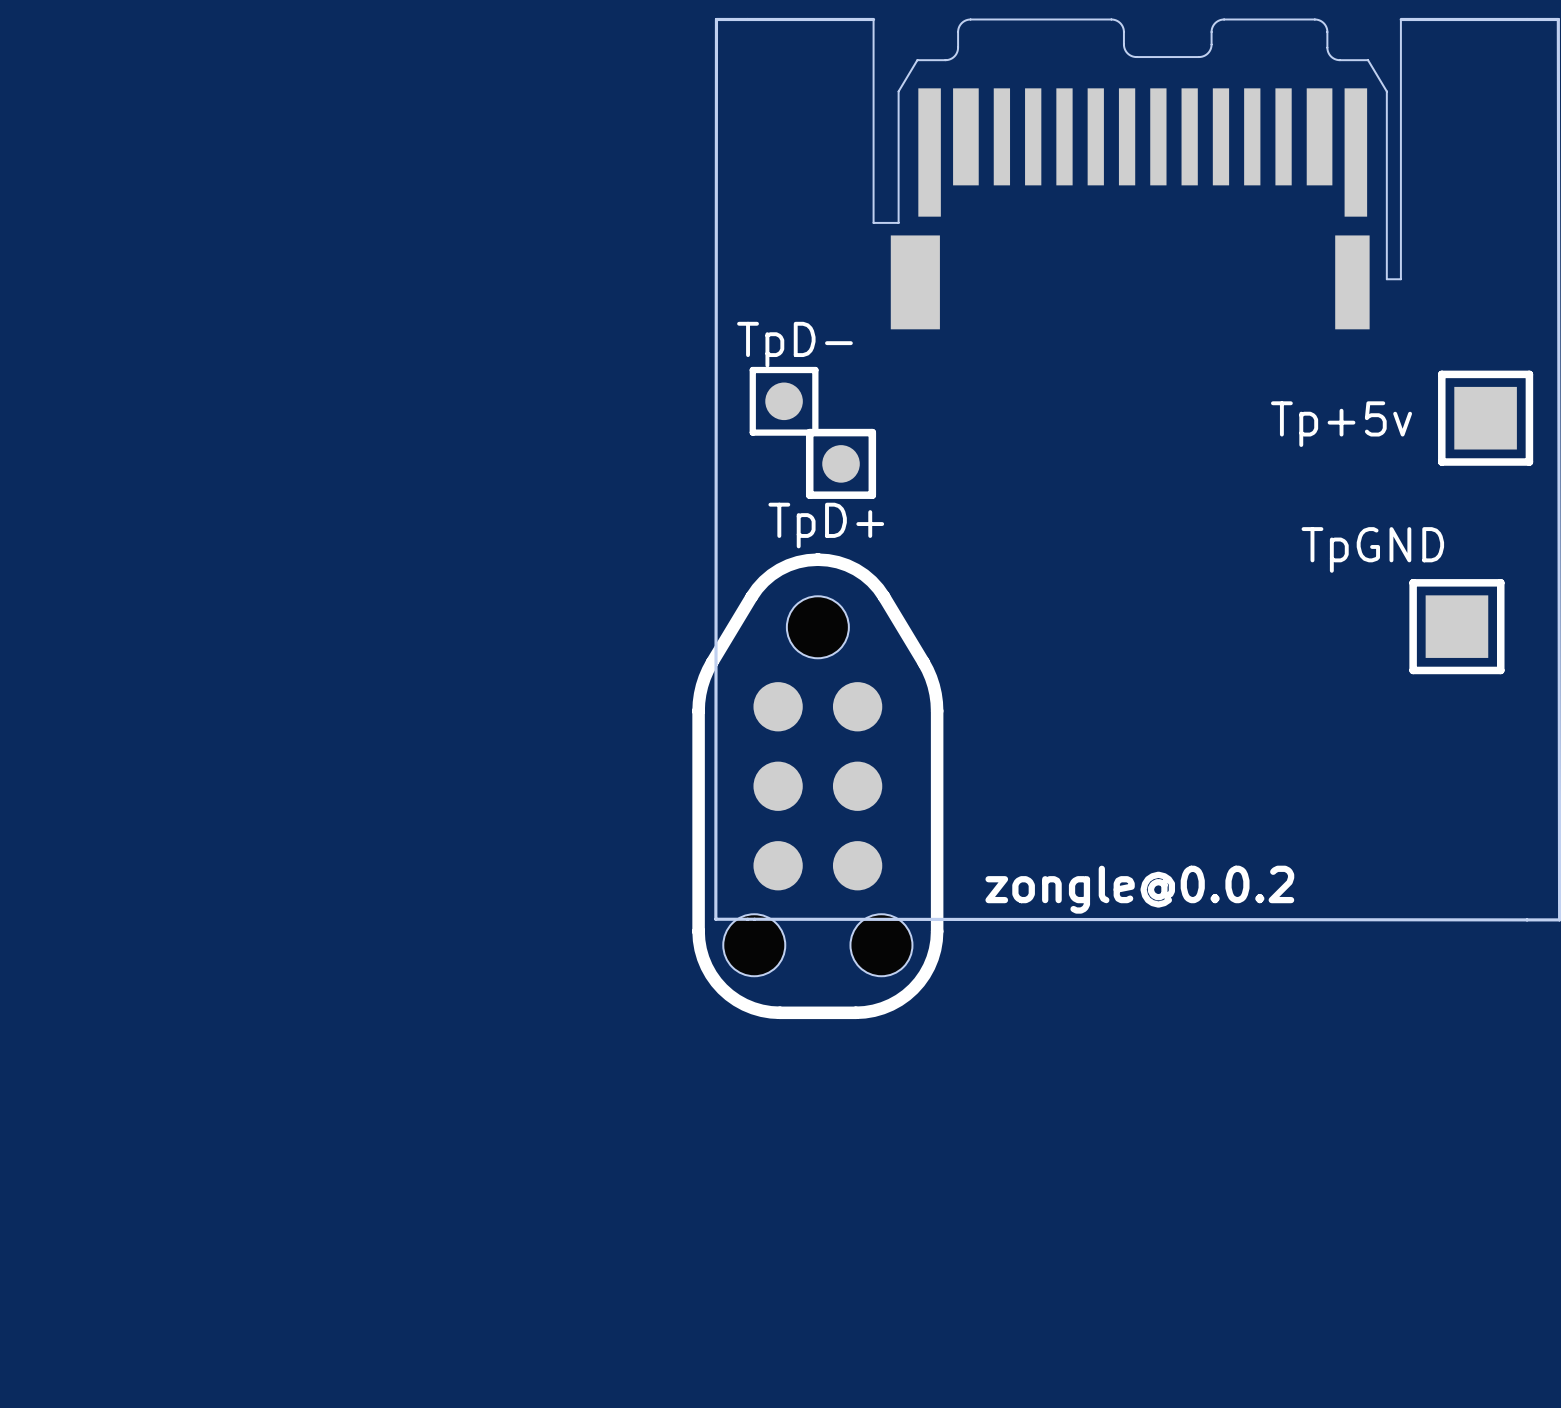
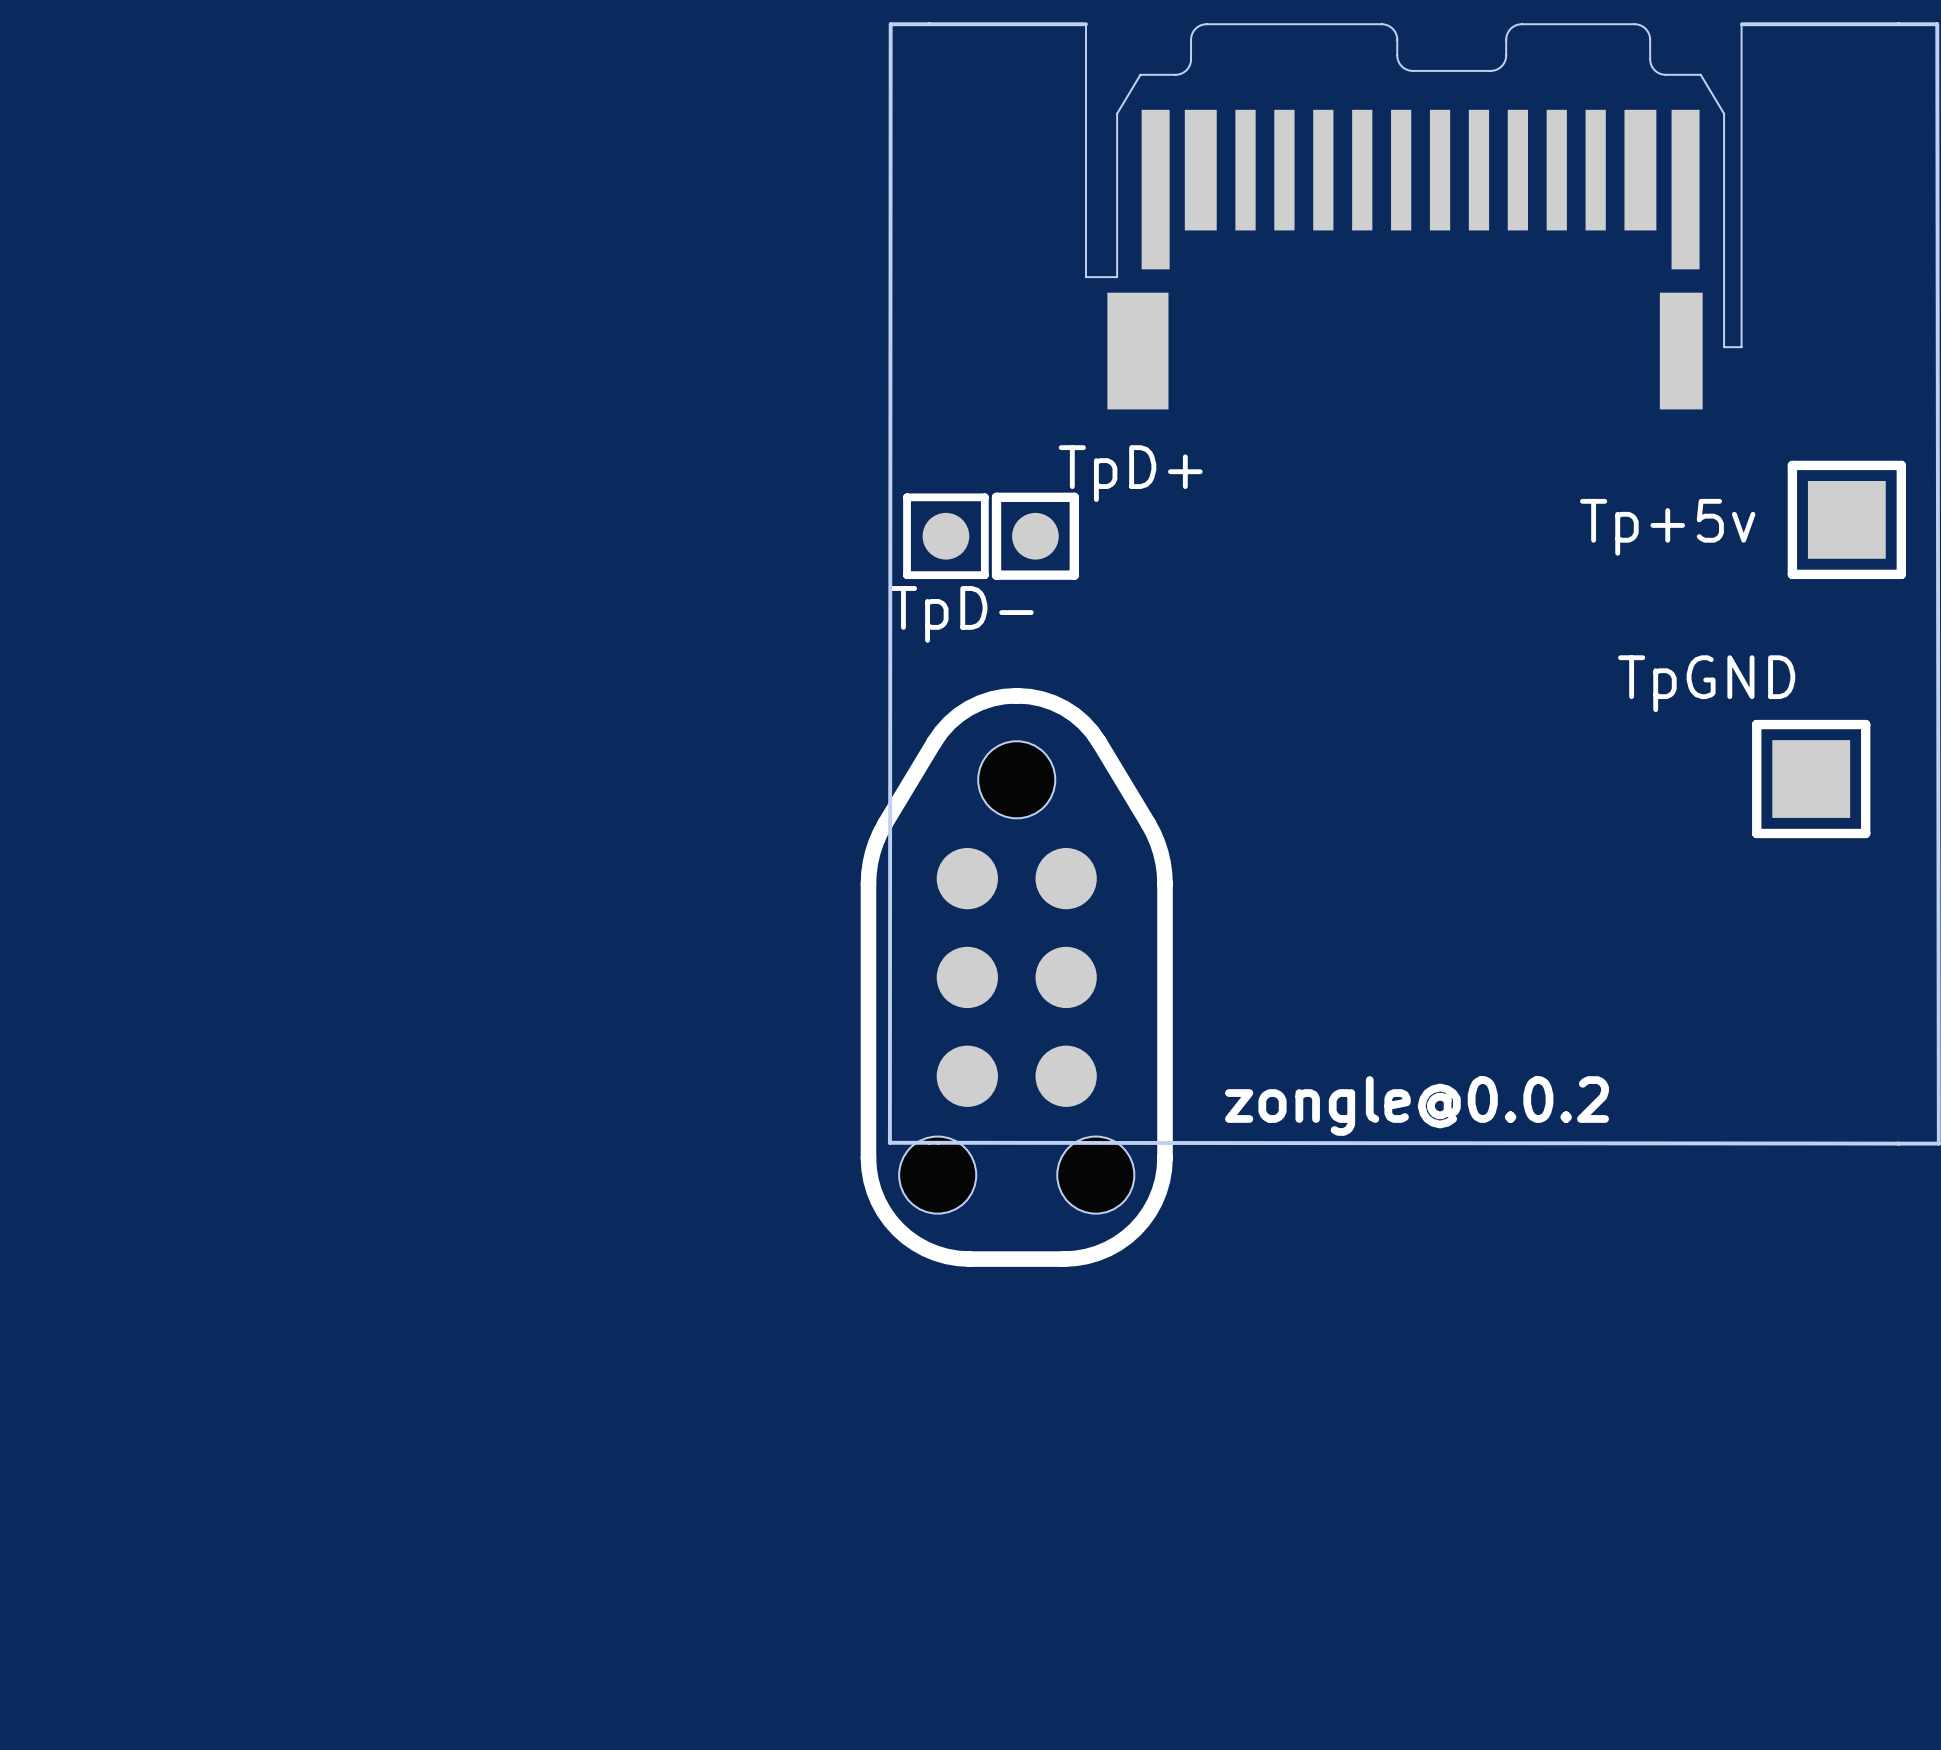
TpD- name position: TpD- (794, 344) -> TpD- (961, 614)
TpD- position: (784, 401) -> (945, 536)
TpD+ position: (841, 463) -> (1035, 536)
TpD+ name position: TpD+ (826, 525) -> TpD+ (1130, 473)

